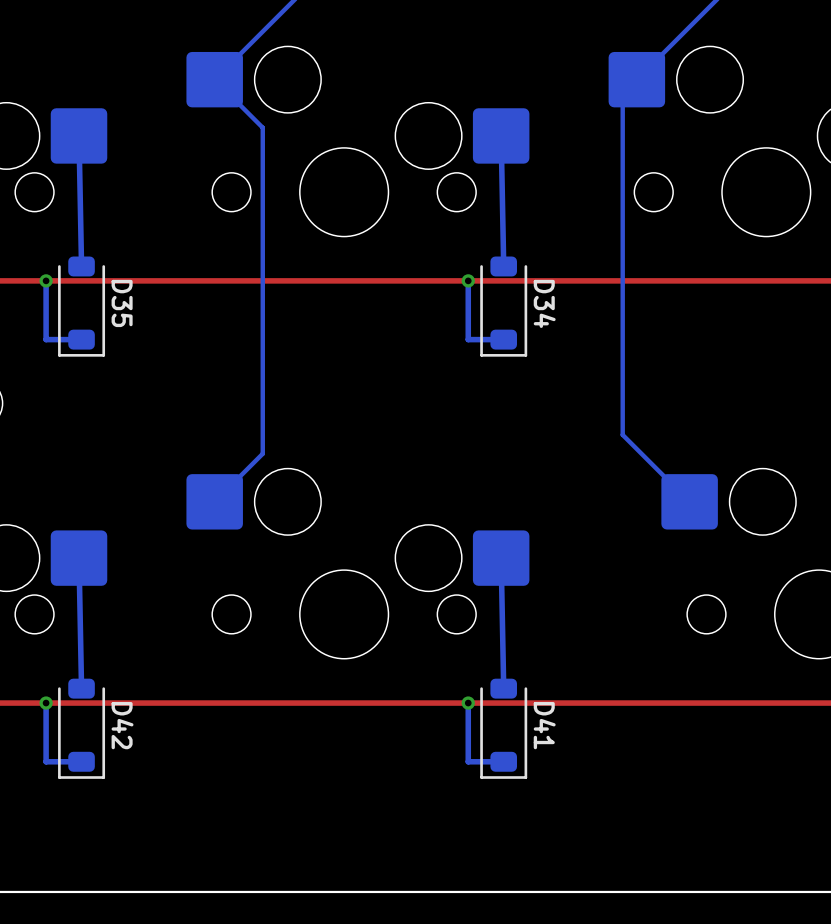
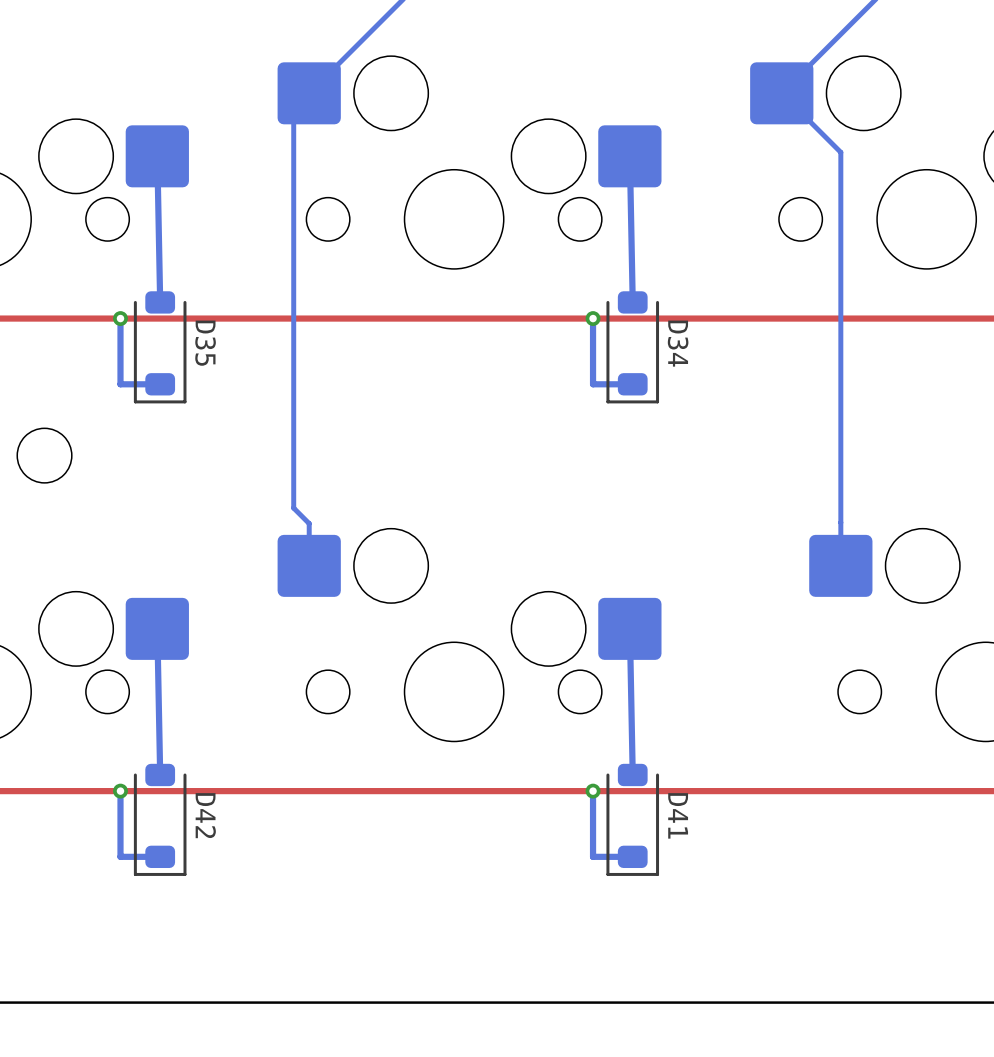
bottom track: (214, 79) (262, 127) (262, 453) (214, 501) -> (309, 93) (293, 108) (293, 508) (309, 523) (309, 565)
bottom track: (636, 79) (622, 93) (622, 434) (689, 501) -> (781, 93) (840, 152) (840, 565)

